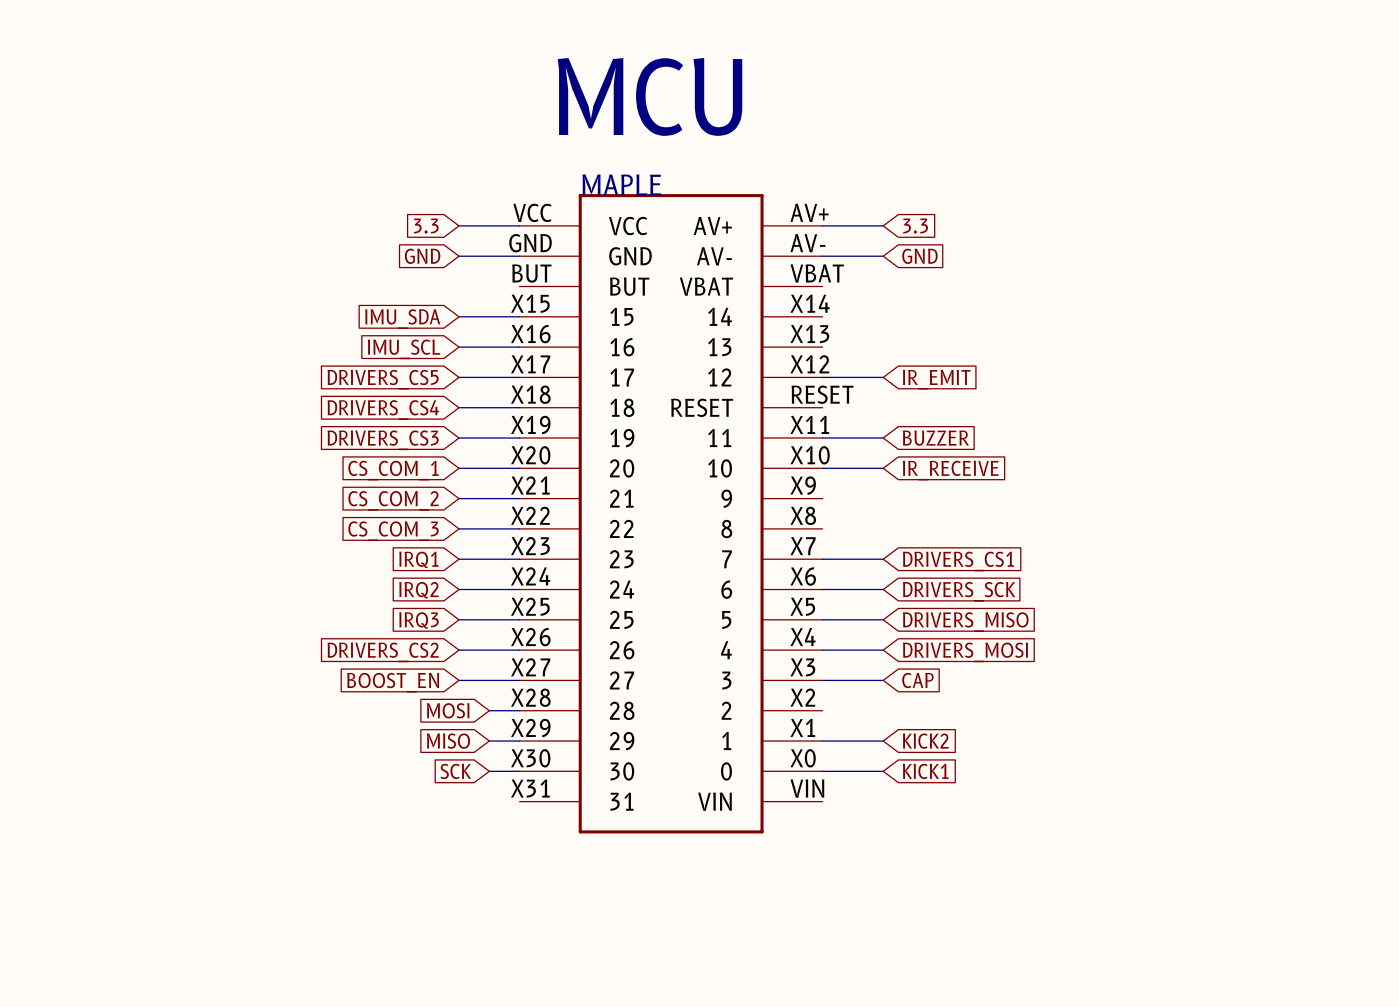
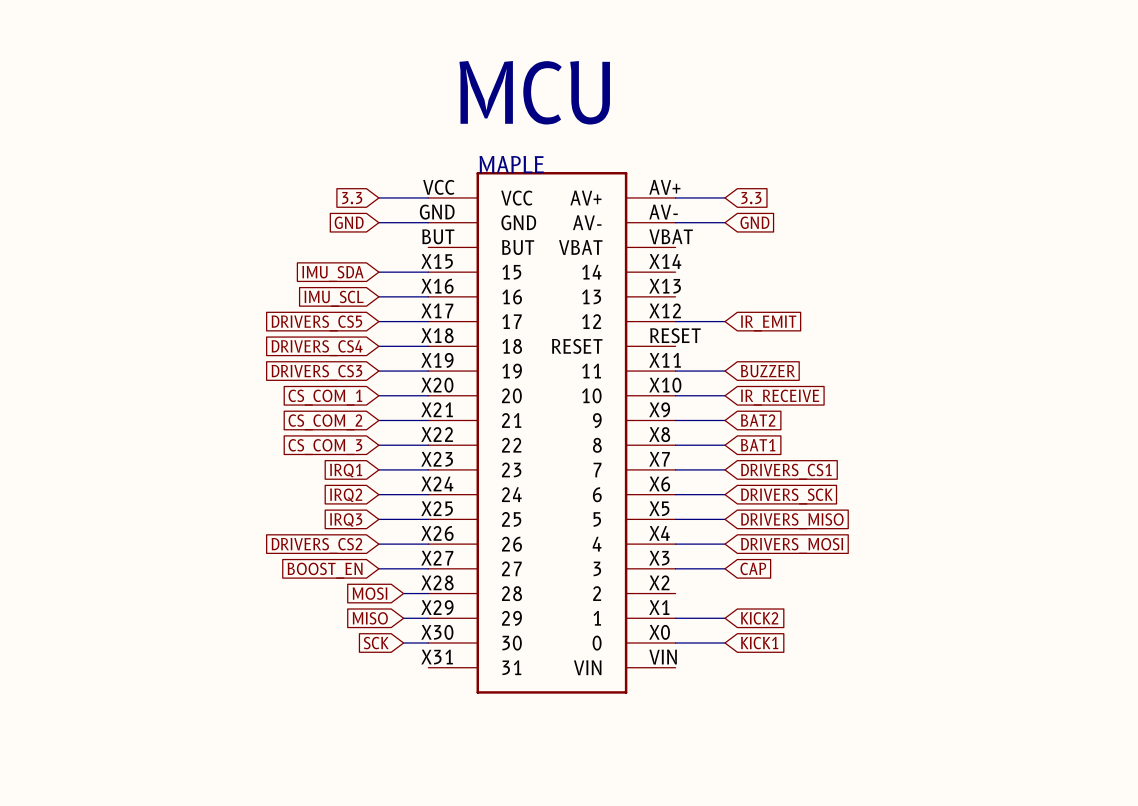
wire: none -> (675, 420) (725, 420)
global label: none -> BAT2 (758, 420)
wire: none -> (675, 445) (725, 445)
global label: none -> BAT1 (758, 445)

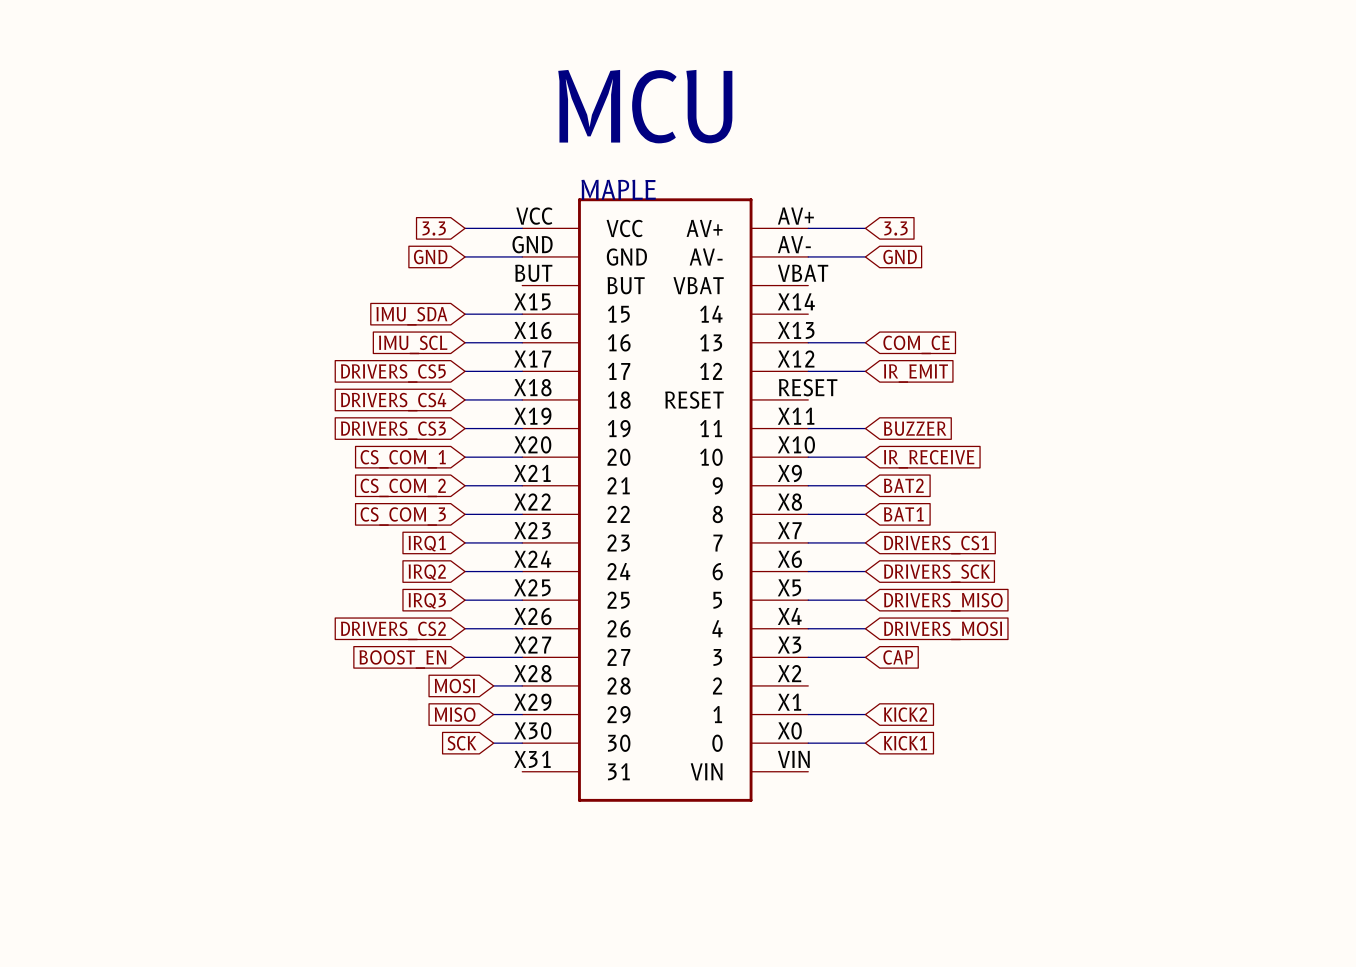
wire: none -> (808, 342) (865, 342)
global label: none -> COM_CE (916, 344)

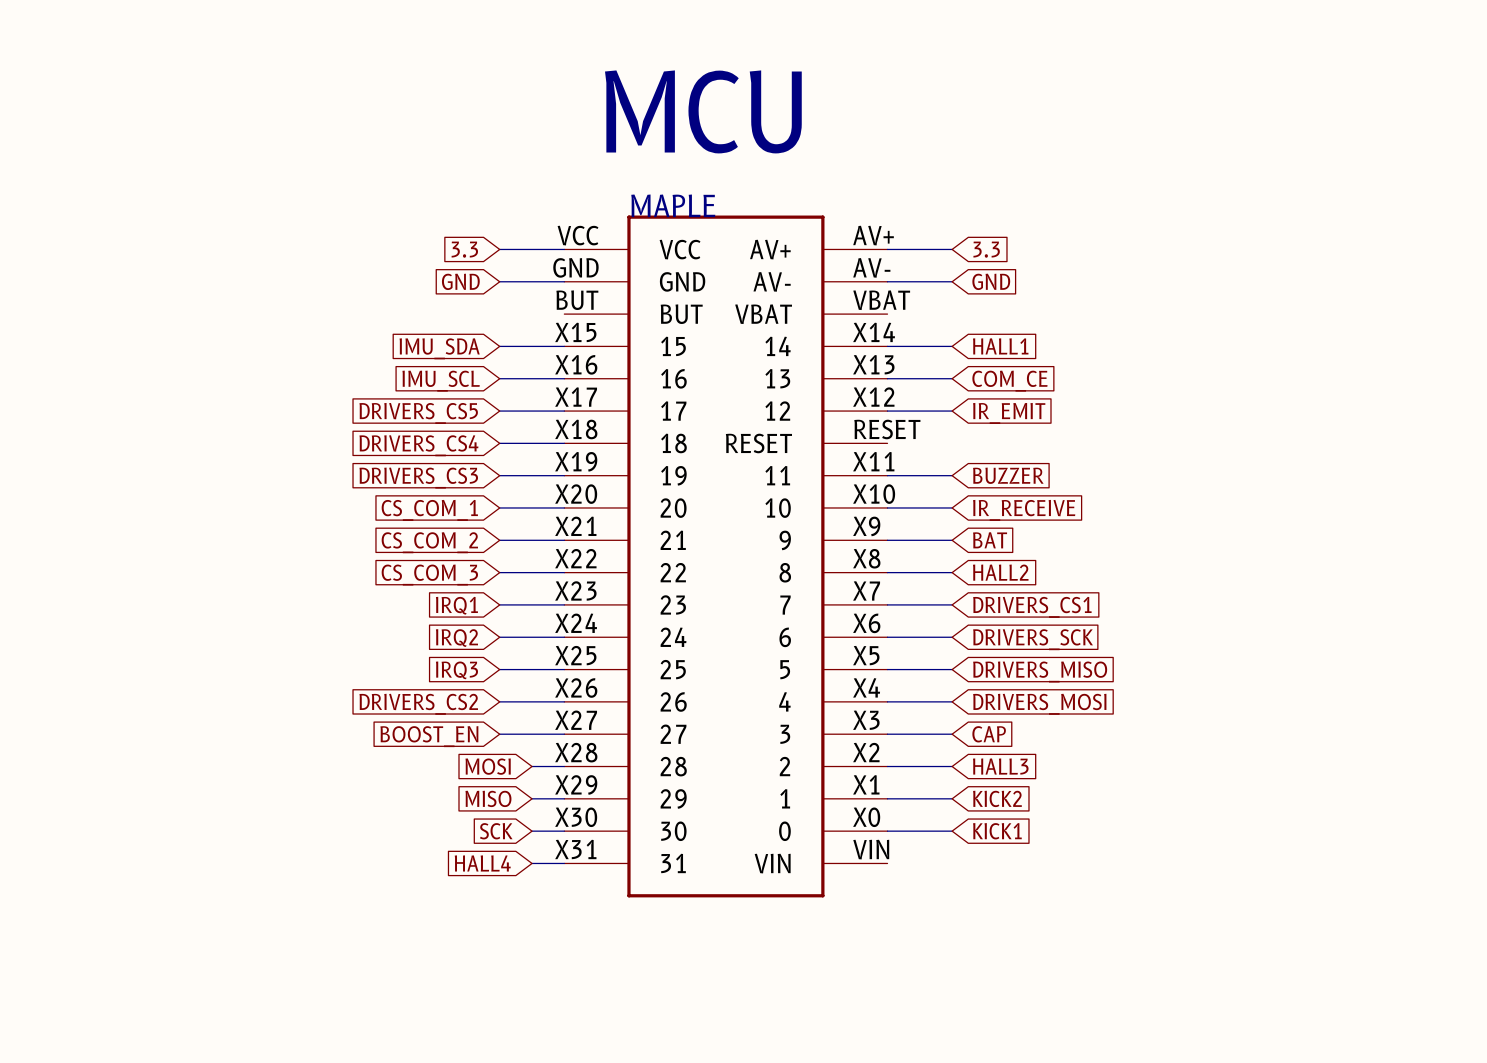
wire: none -> (887, 346) (952, 346)
global label: none -> HALL1 (1000, 346)
global label: BAT2 (903, 485) -> BAT (990, 540)
global label: BAT1 (903, 514) -> HALL2 (1000, 572)
wire: none -> (887, 766) (952, 766)
global label: none -> HALL3 (1000, 766)
global label: none -> HALL4 (482, 863)
wire: none -> (532, 863) (564, 863)

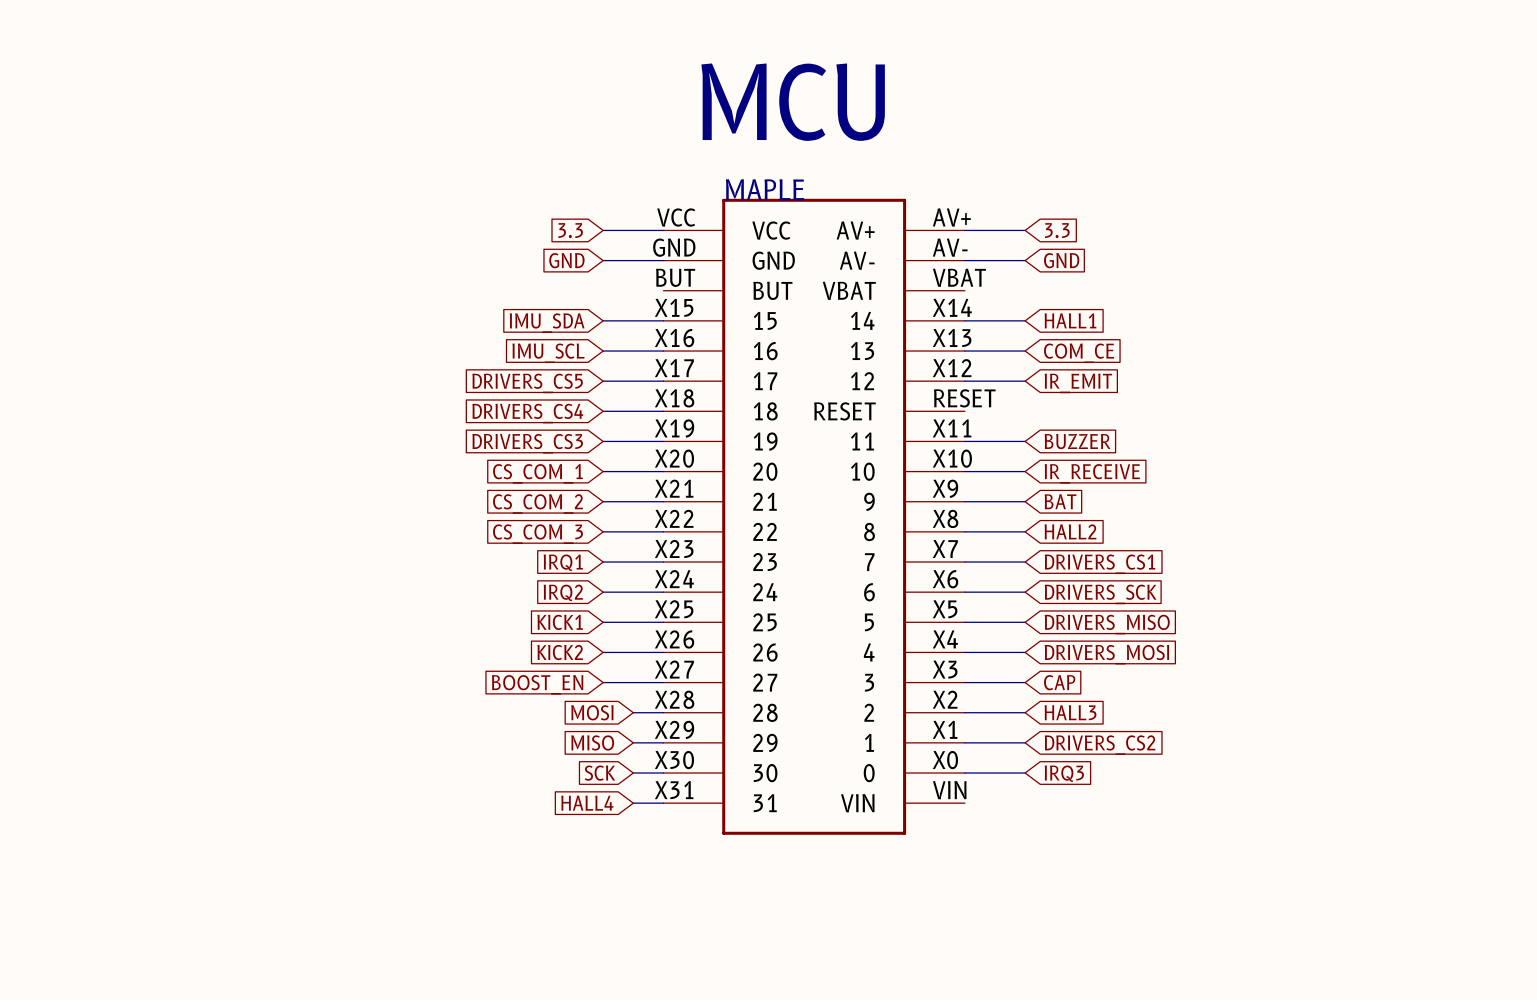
global label: IRQ3 (456, 670) -> KICK1 (560, 622)
global label: DRIVERS_CS2 (418, 704) -> KICK2 (560, 652)
global label: KICK2 (997, 798) -> DRIVERS_CS2 (1100, 745)
global label: KICK1 (997, 831) -> IRQ3 (1064, 773)

